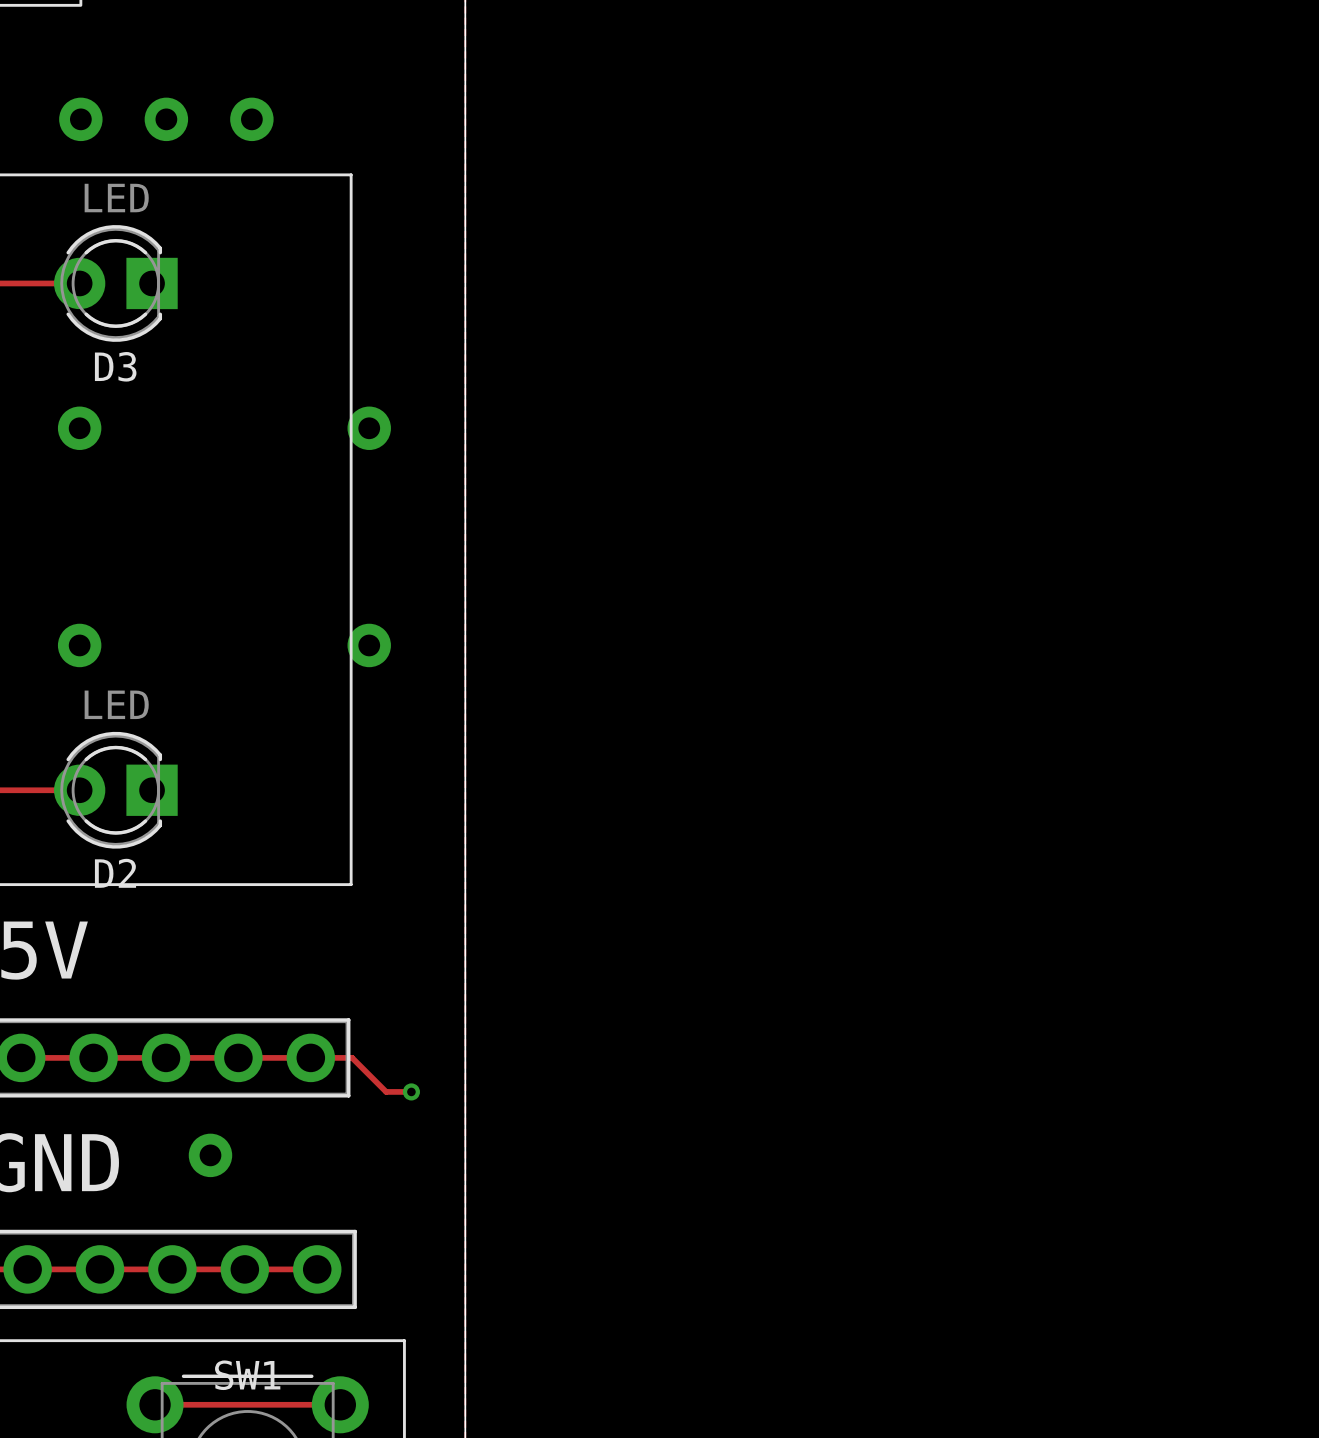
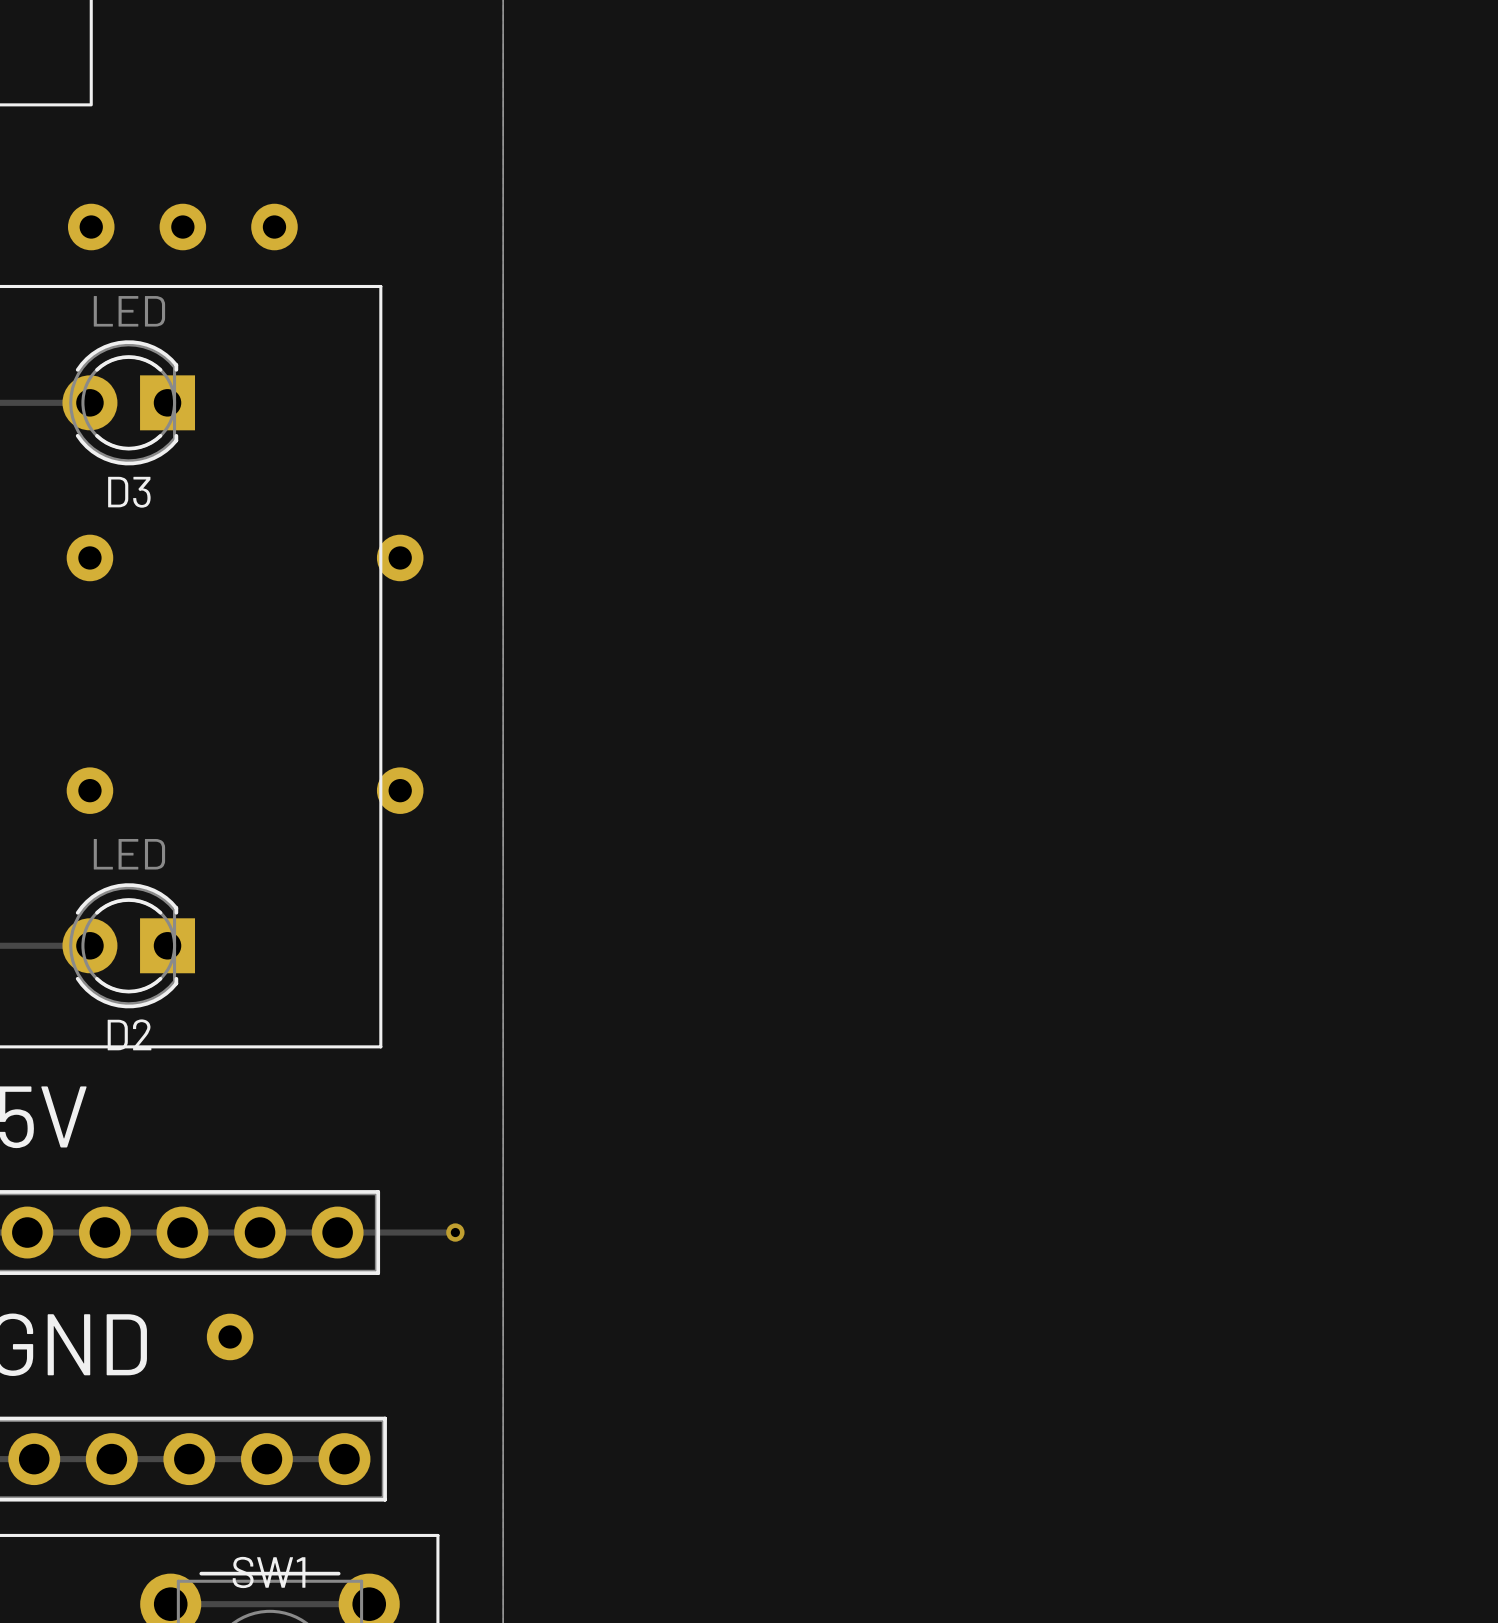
track: (352, 1057) (386, 1091) (411, 1091) -> (381, 1232) (455, 1232)
via position: (411, 1091) -> (455, 1232)

